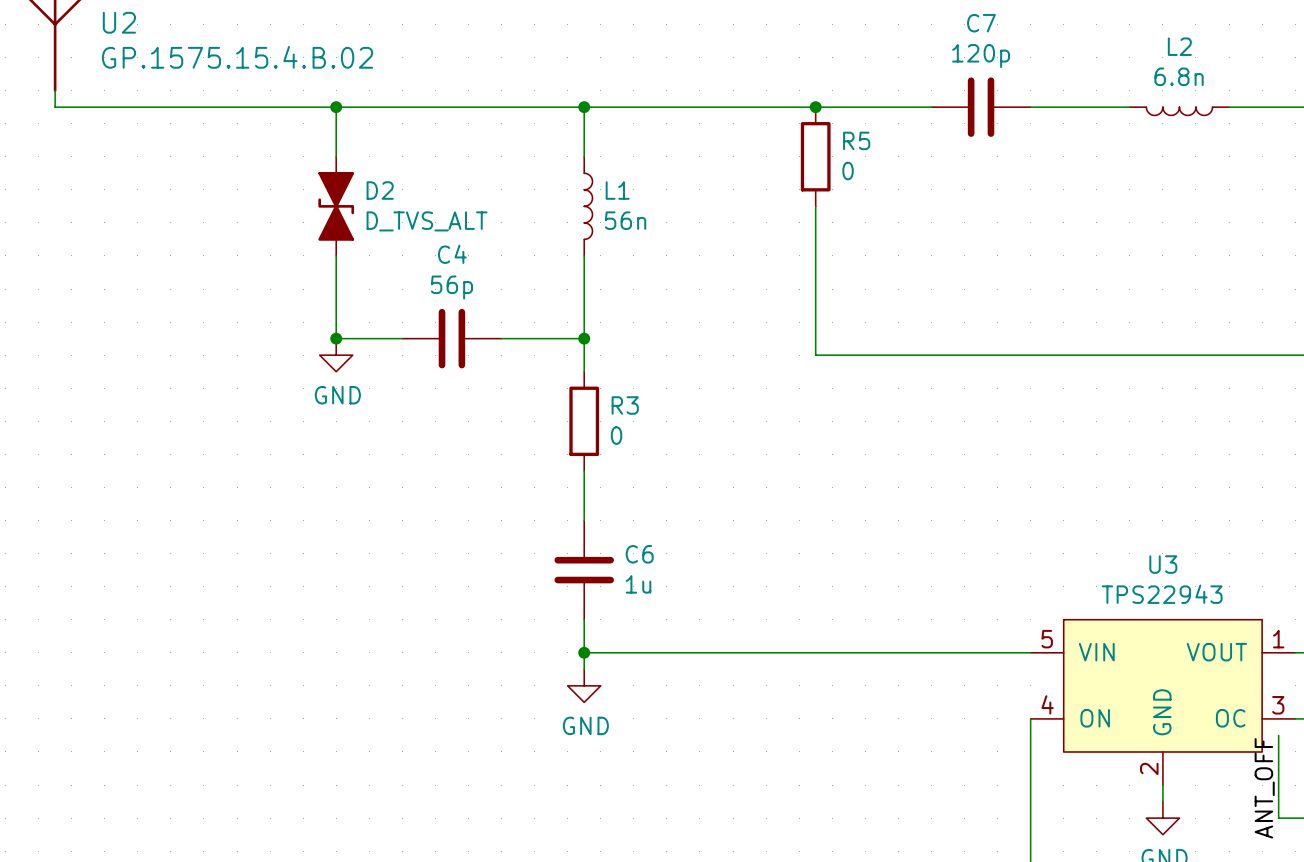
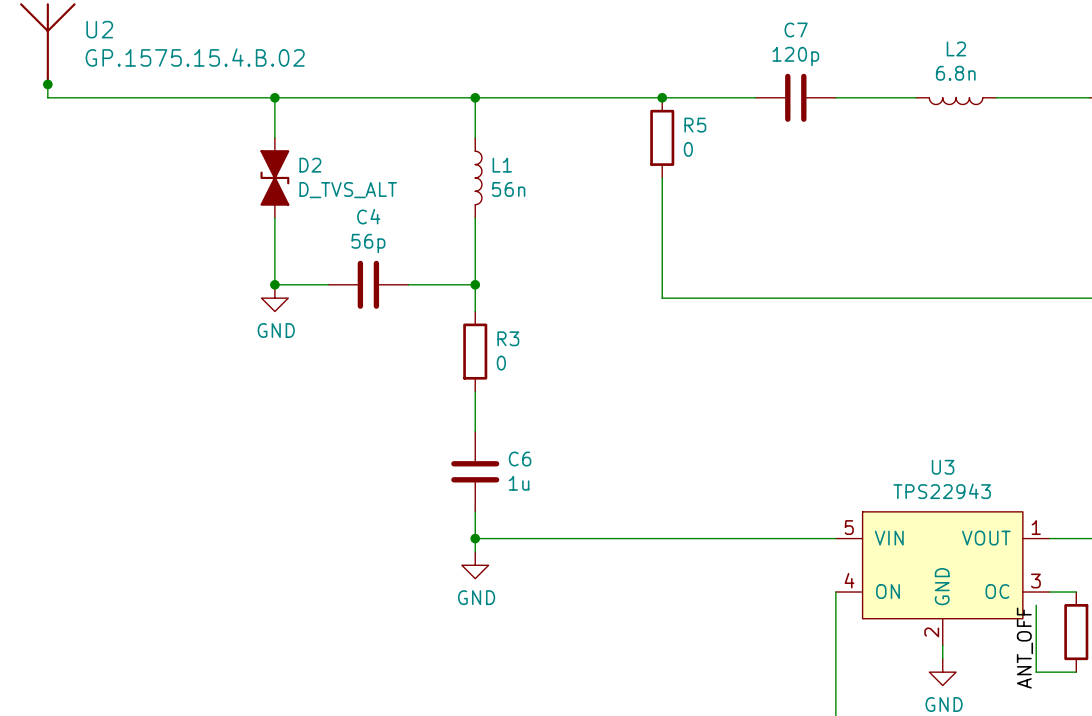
junction: none -> (47, 84)

